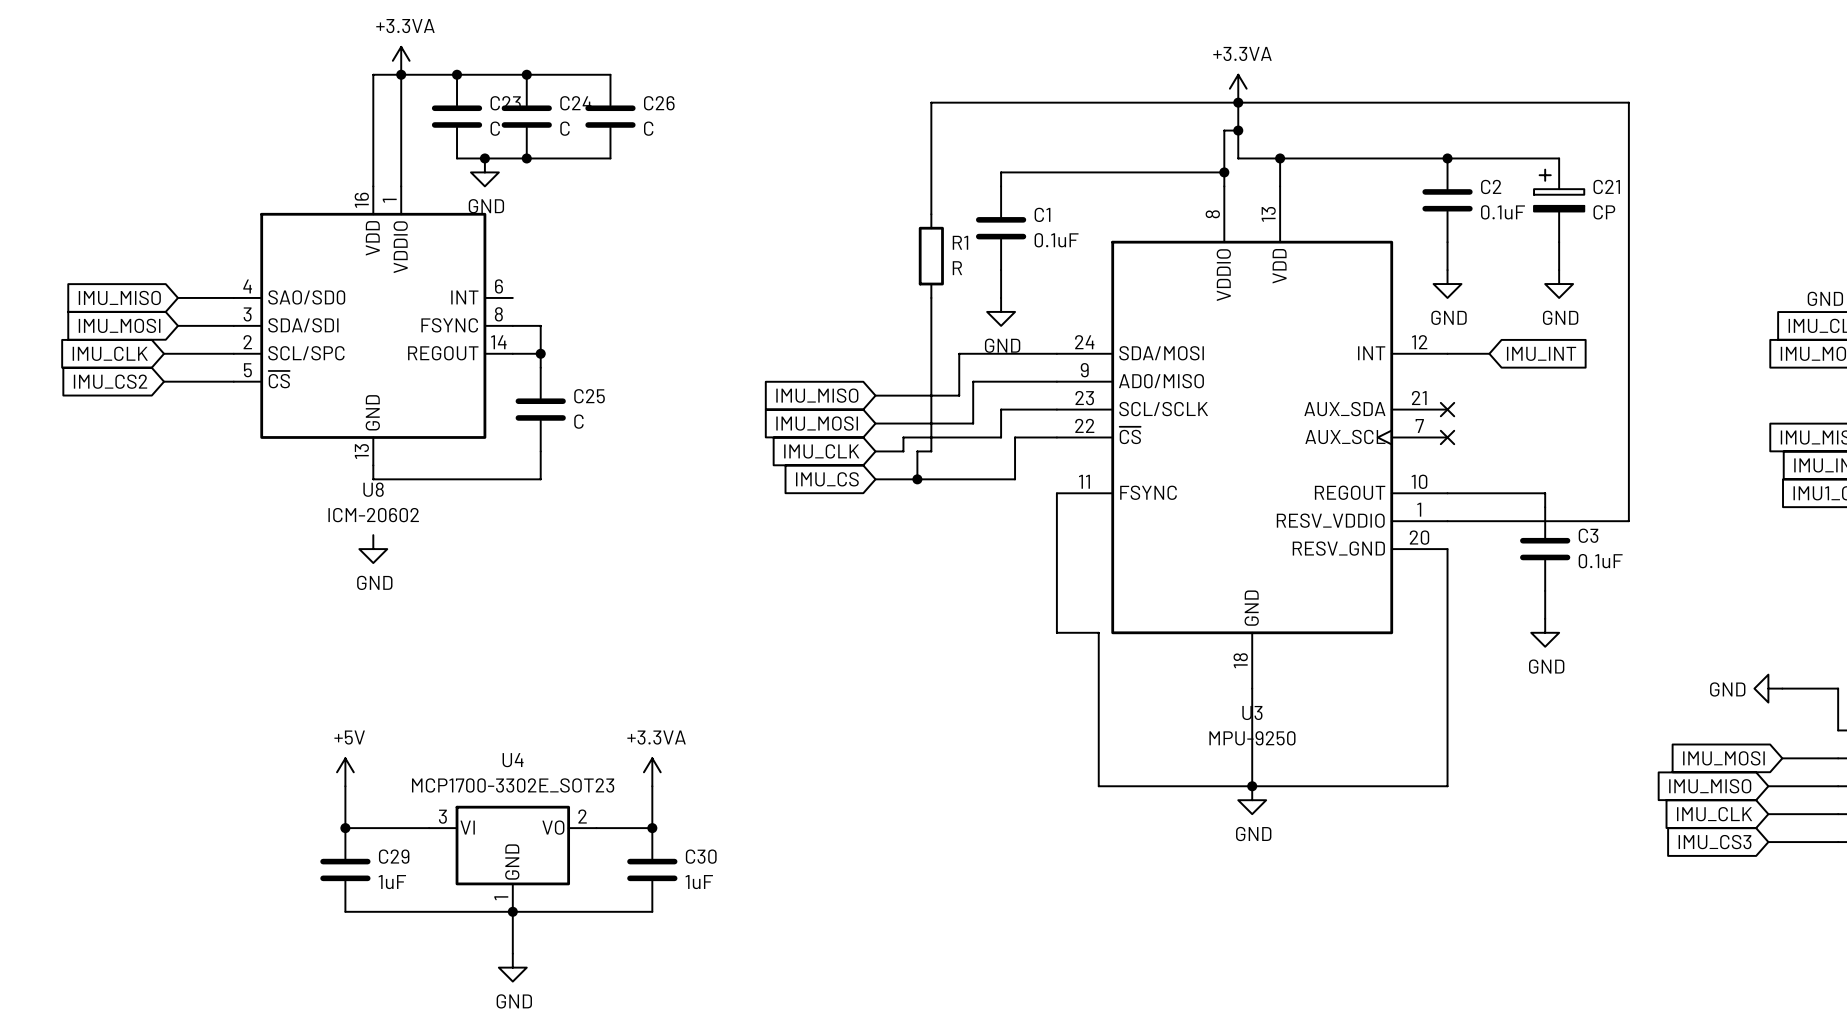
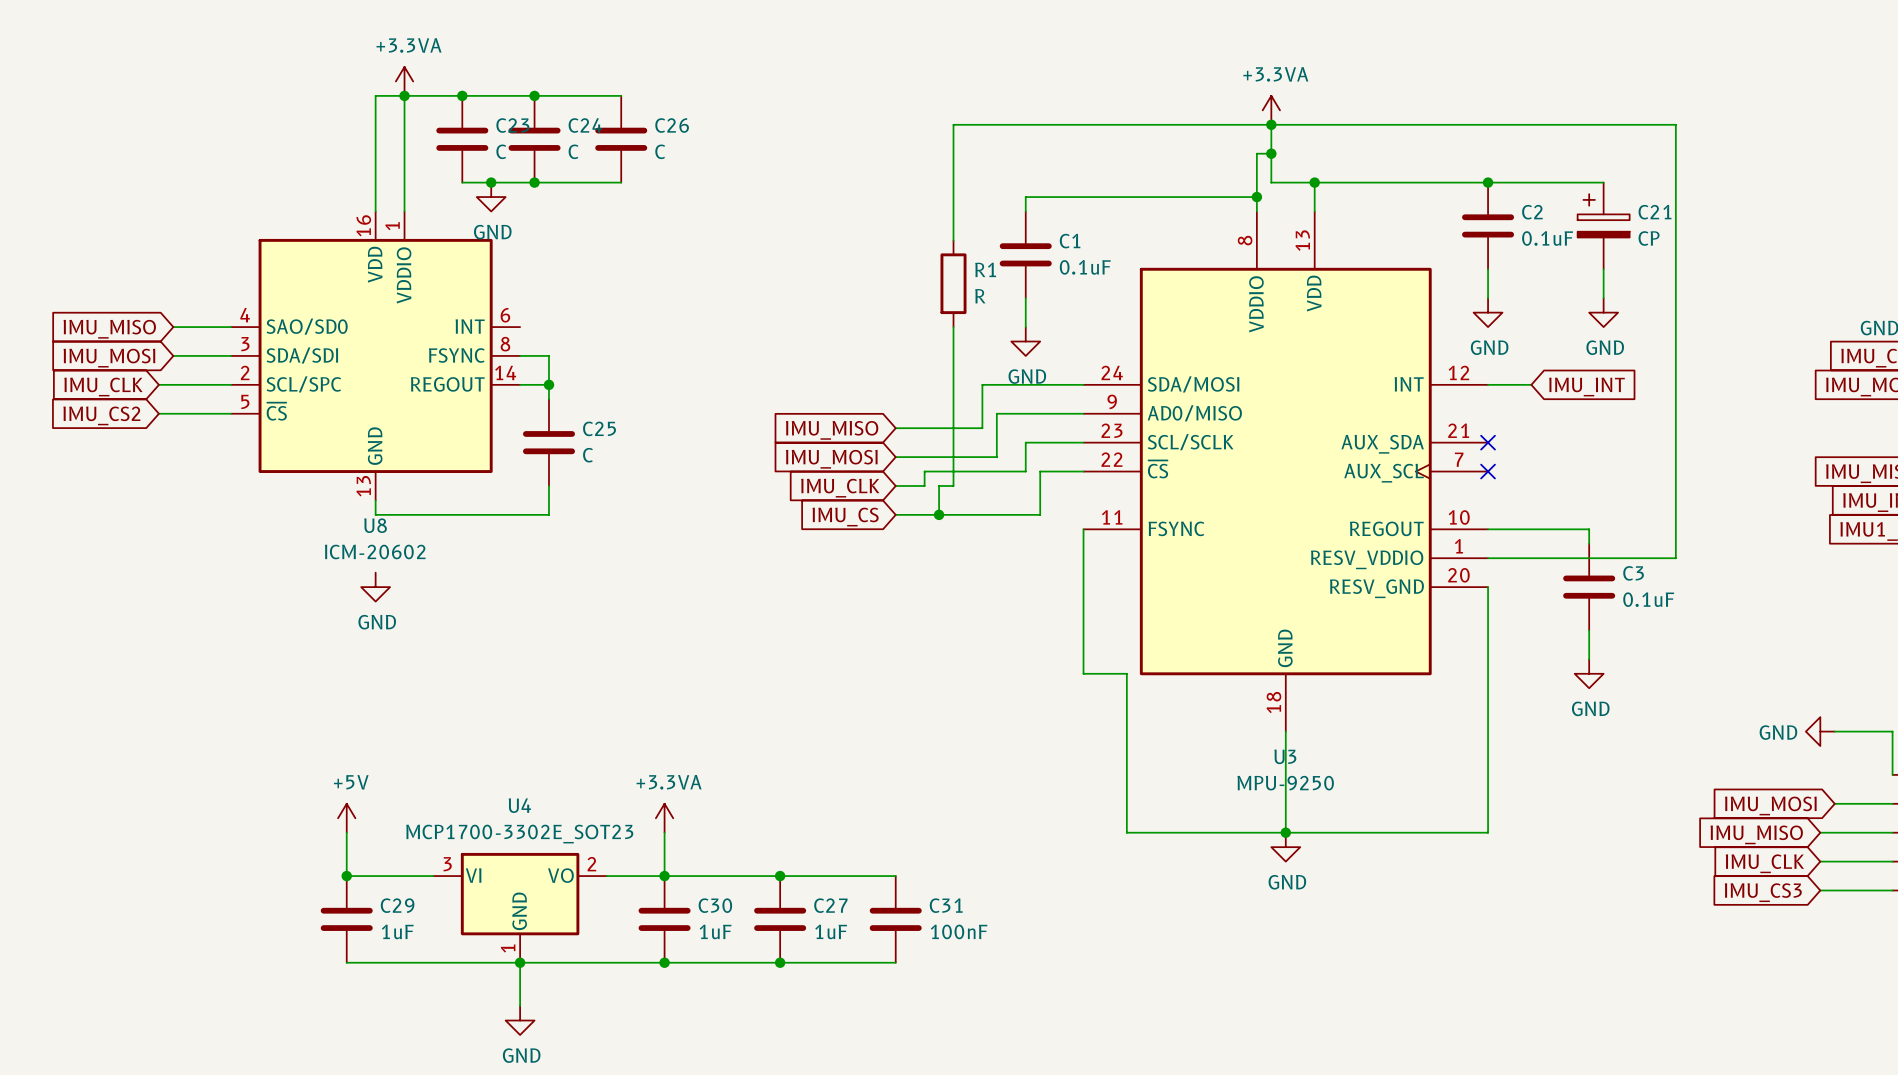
wire: none -> (664, 876) (895, 876)
junction: none -> (780, 876)
C27: none -> 1uF (780, 919)
C31: none -> 100nF (895, 919)
wire: none -> (664, 962) (895, 962)
junction: none -> (664, 962)
junction: none -> (780, 962)

